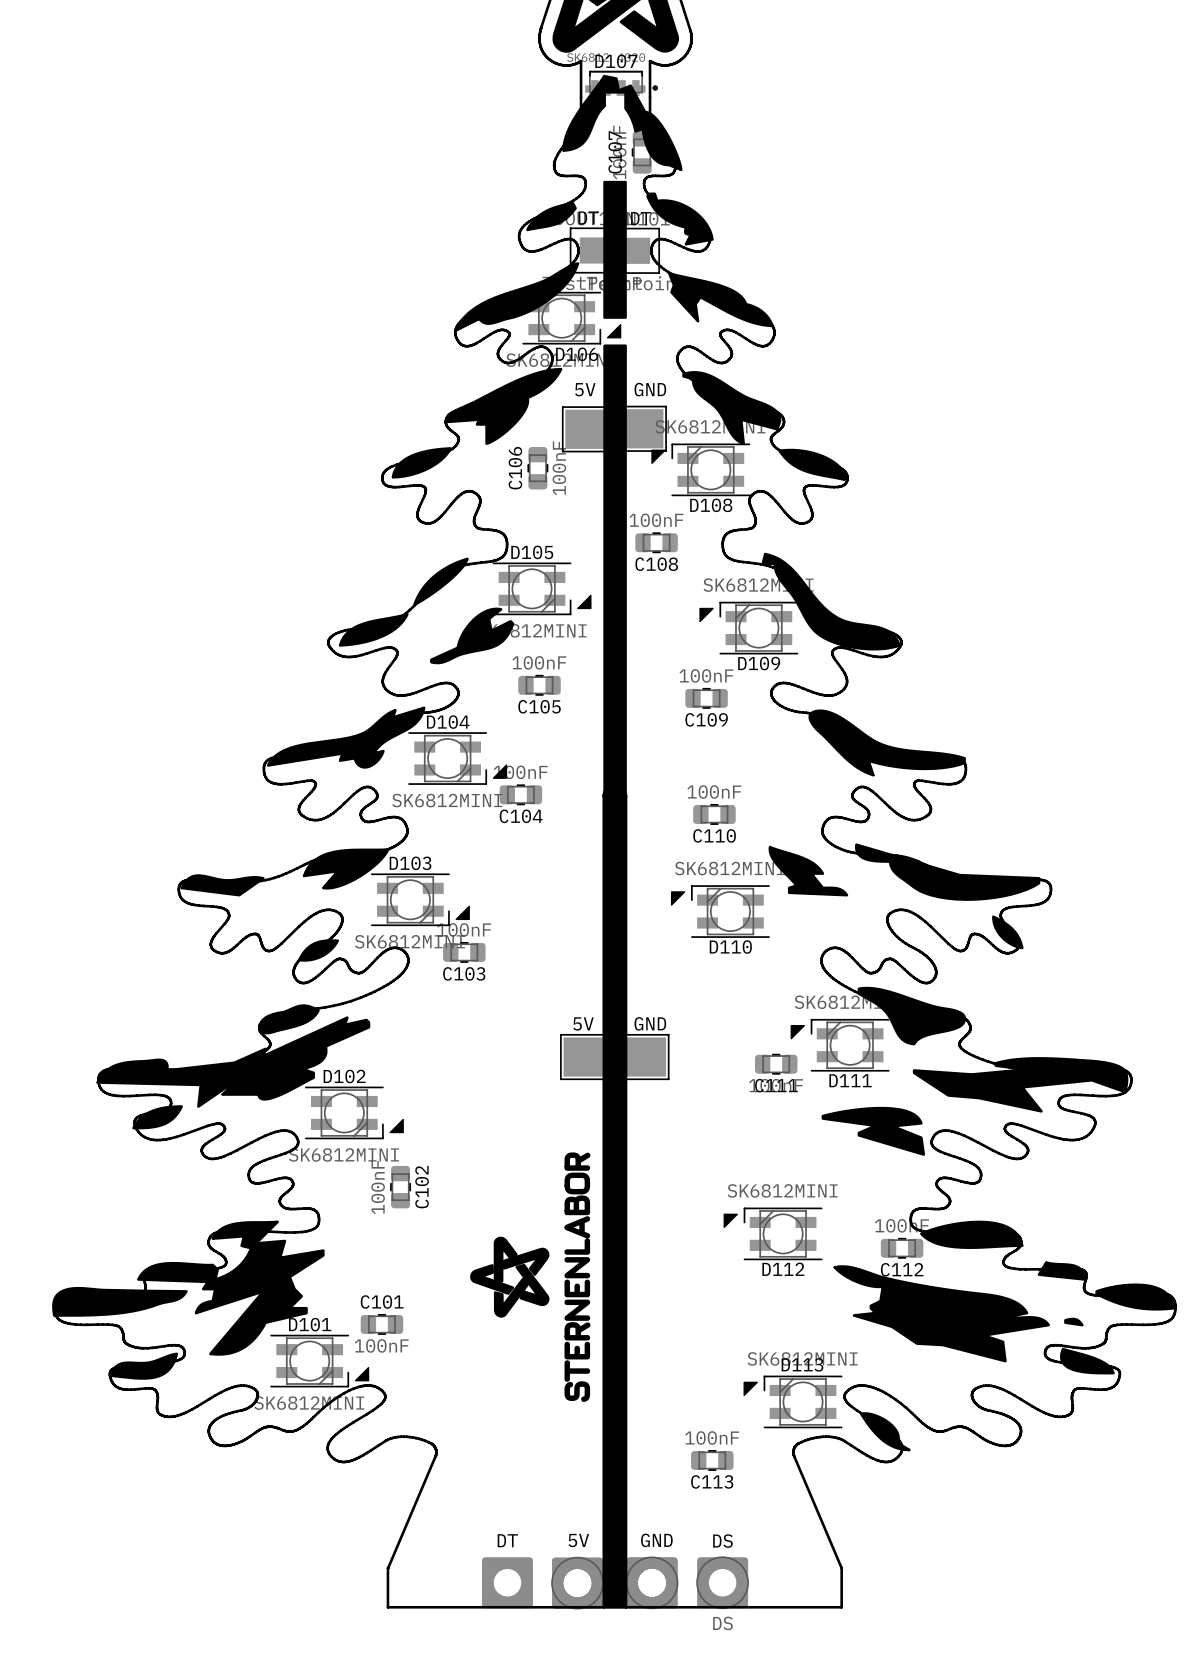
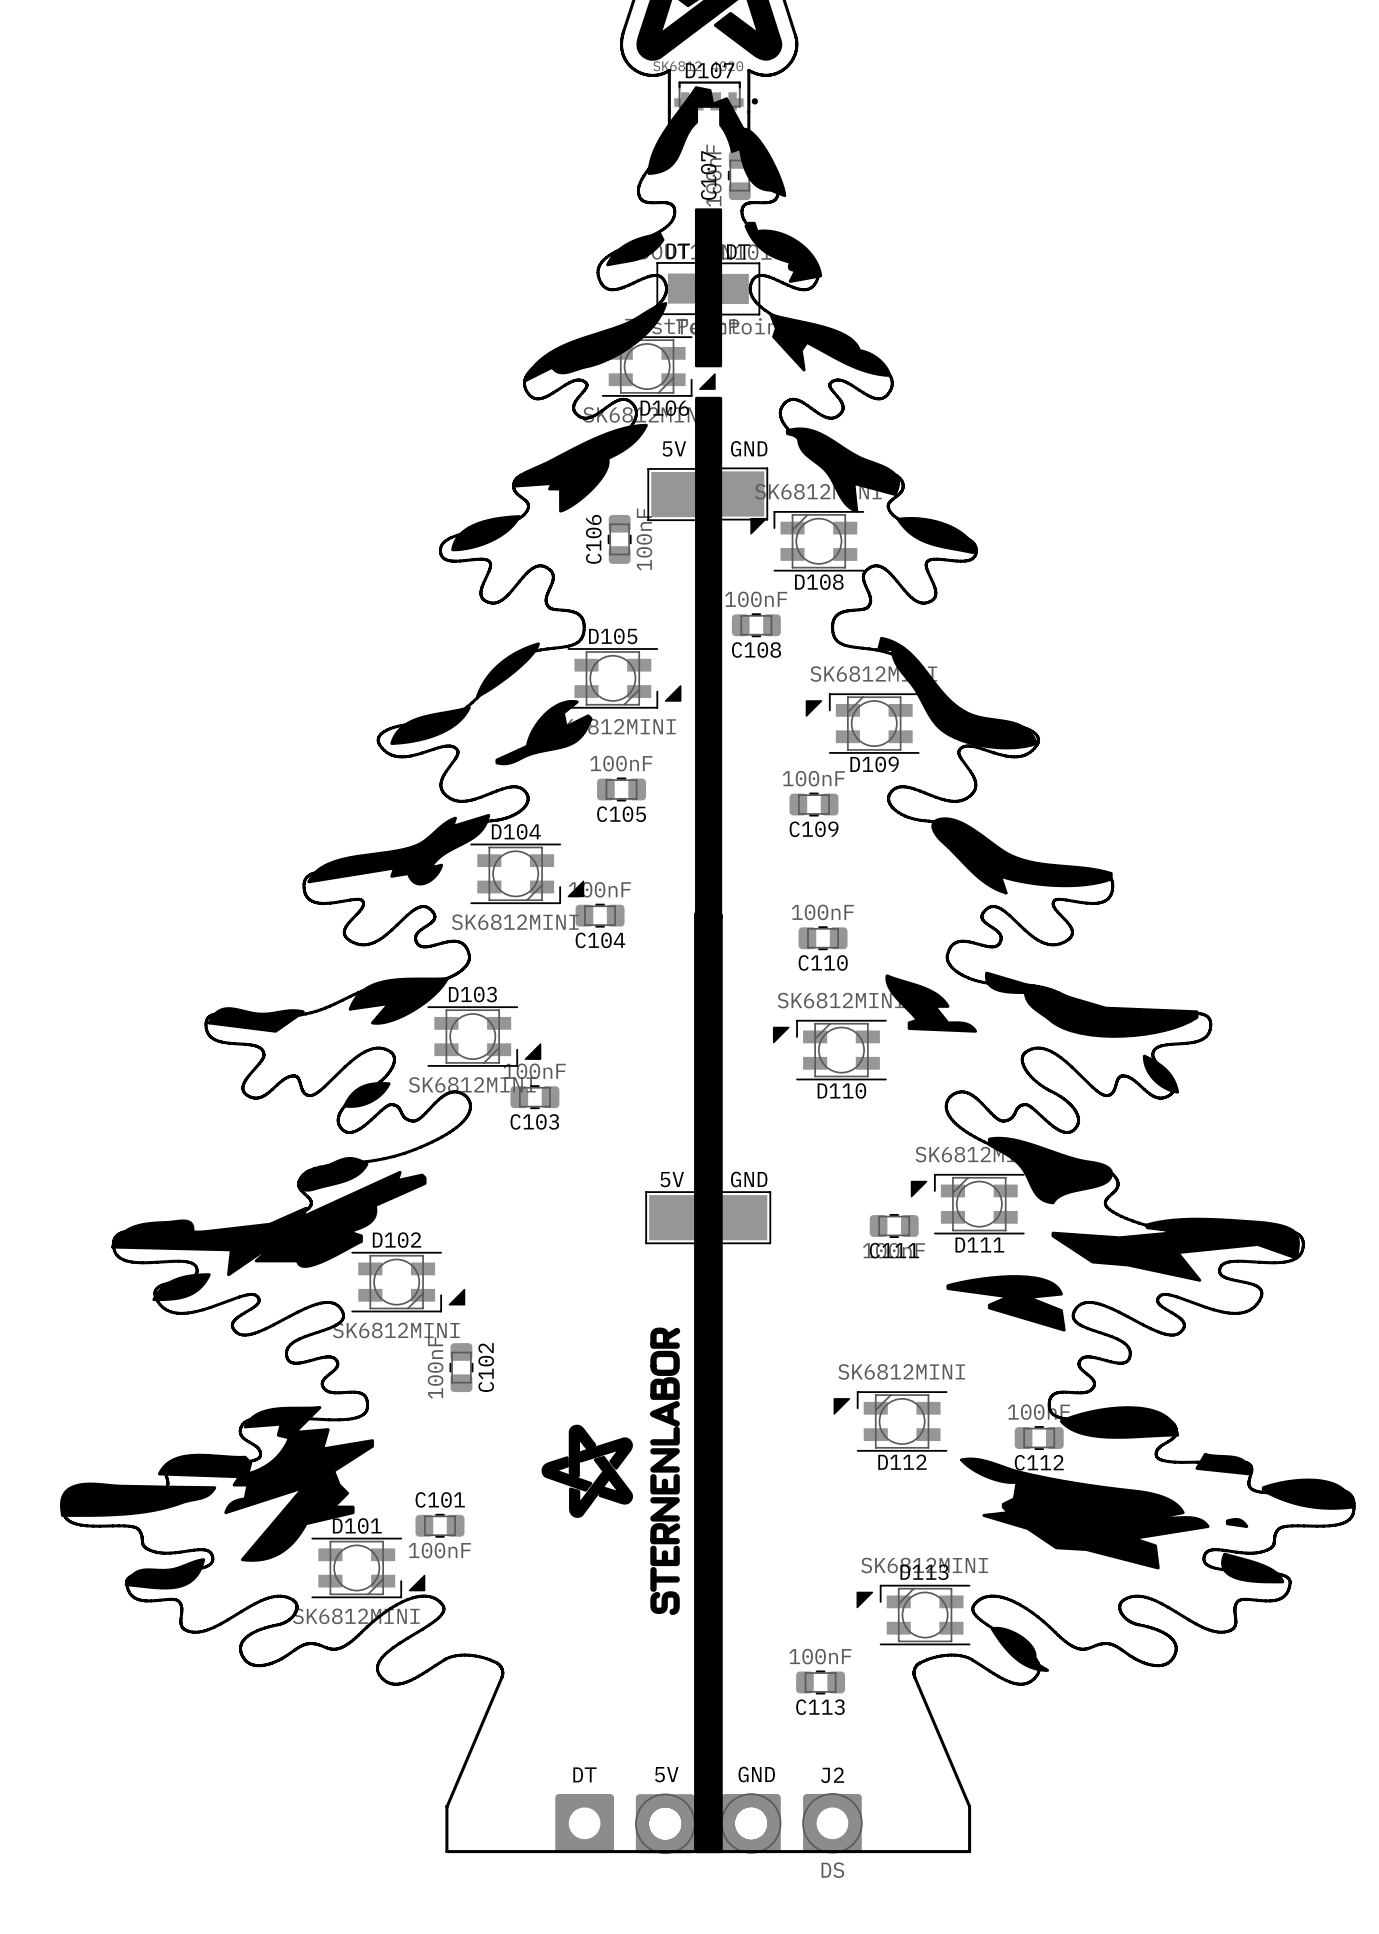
DS name: DS (722, 1541) -> J2 (832, 1775)

